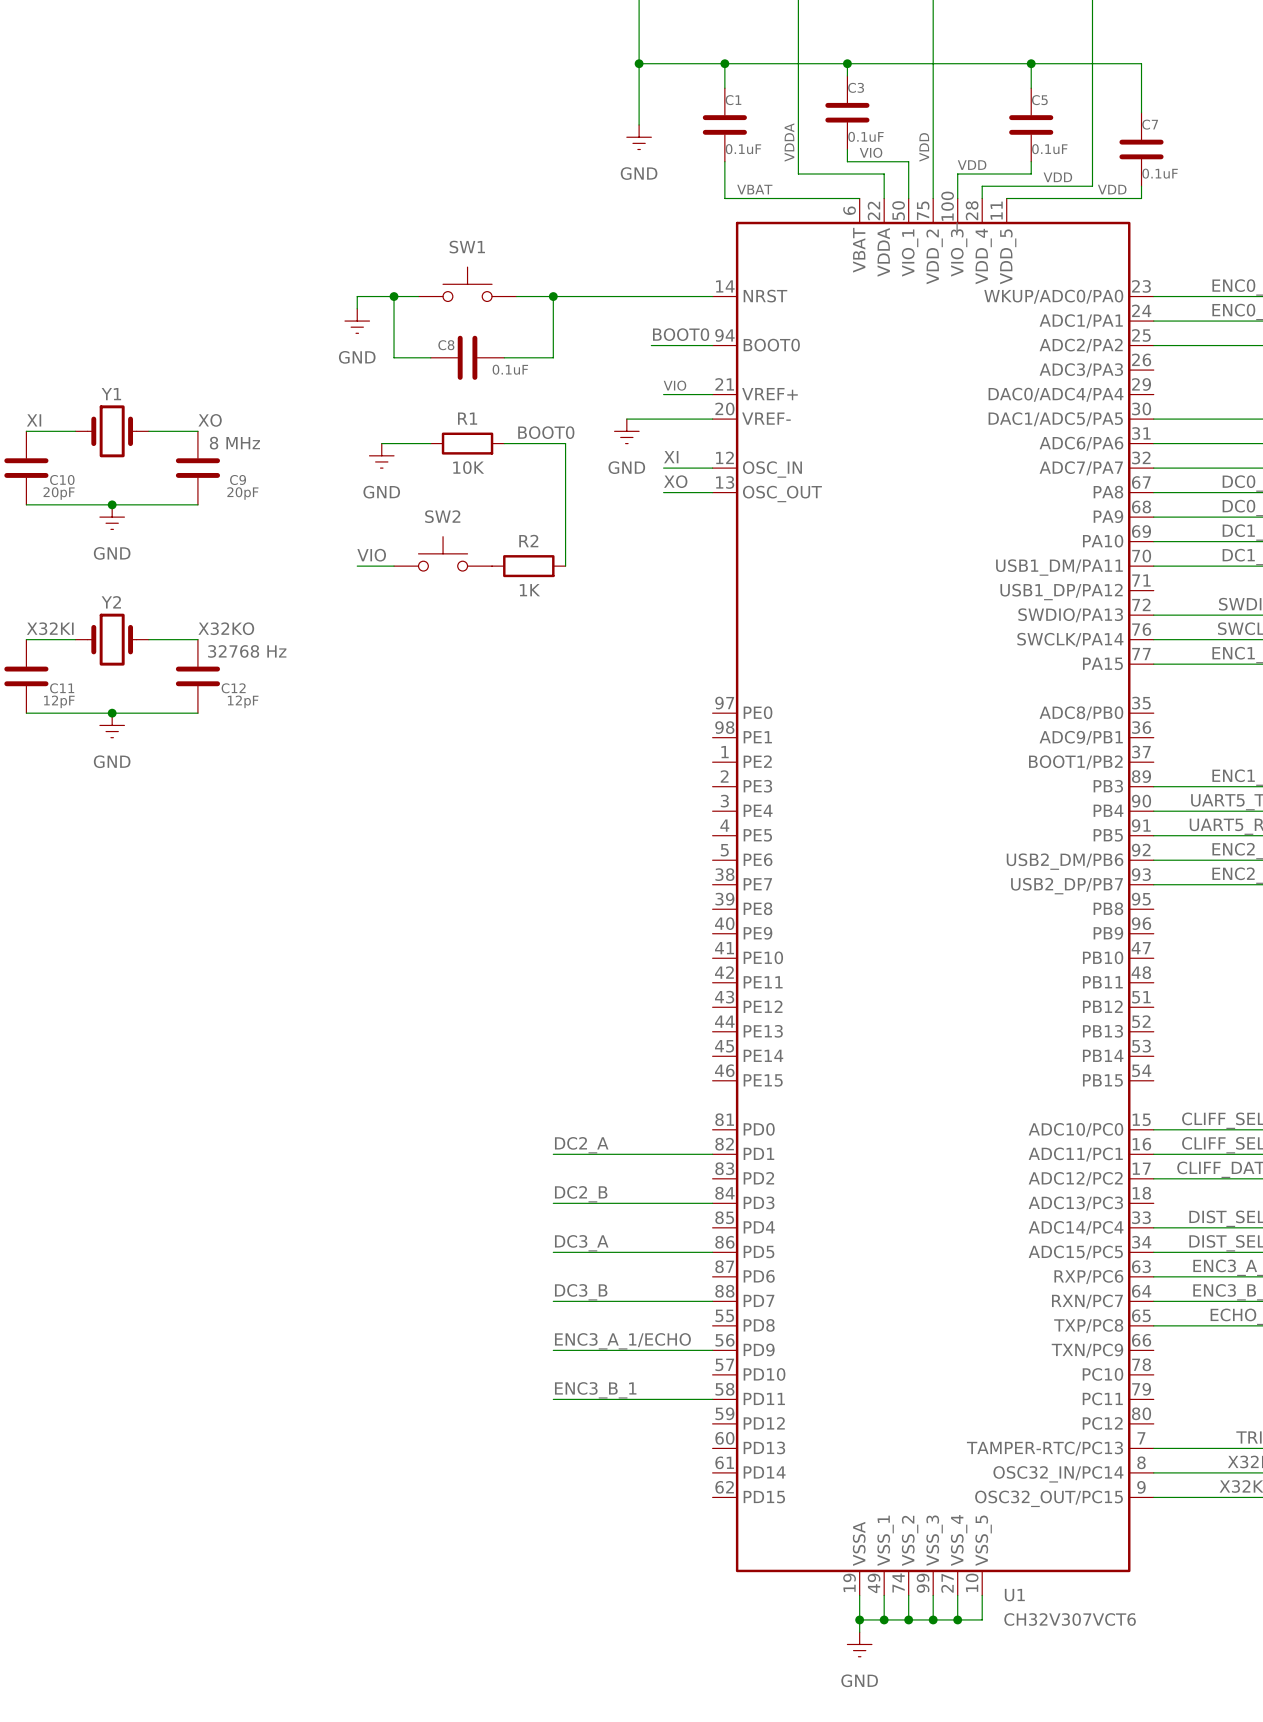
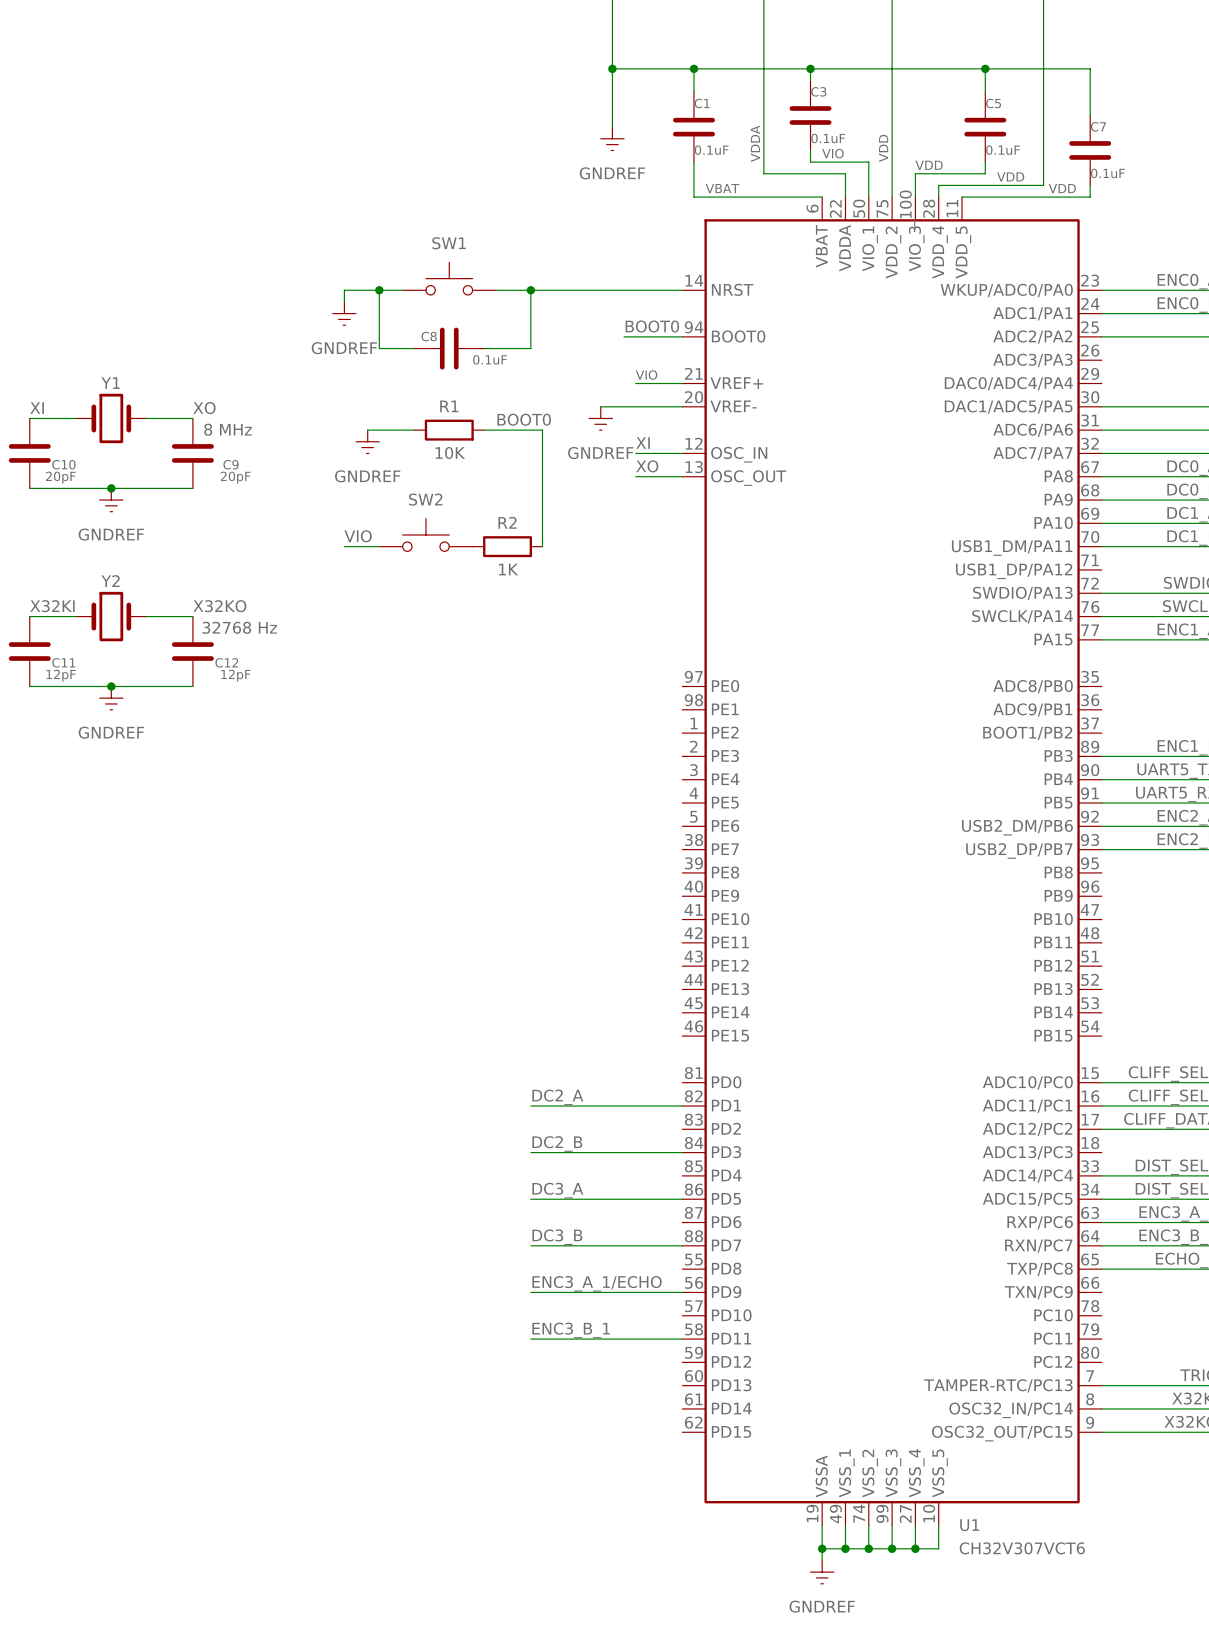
power symbol: GND (639, 137) -> GNDREF (612, 138)
power symbol: GND (357, 321) -> GNDREF (344, 313)
power symbol: GND (626, 431) -> GNDREF (600, 418)
power symbol: GND (381, 455) -> GNDREF (367, 441)
power symbol: GND (112, 517) -> GNDREF (111, 500)
power symbol: GND (112, 725) -> GNDREF (111, 698)
power symbol: GND (859, 1644) -> GNDREF (822, 1572)

